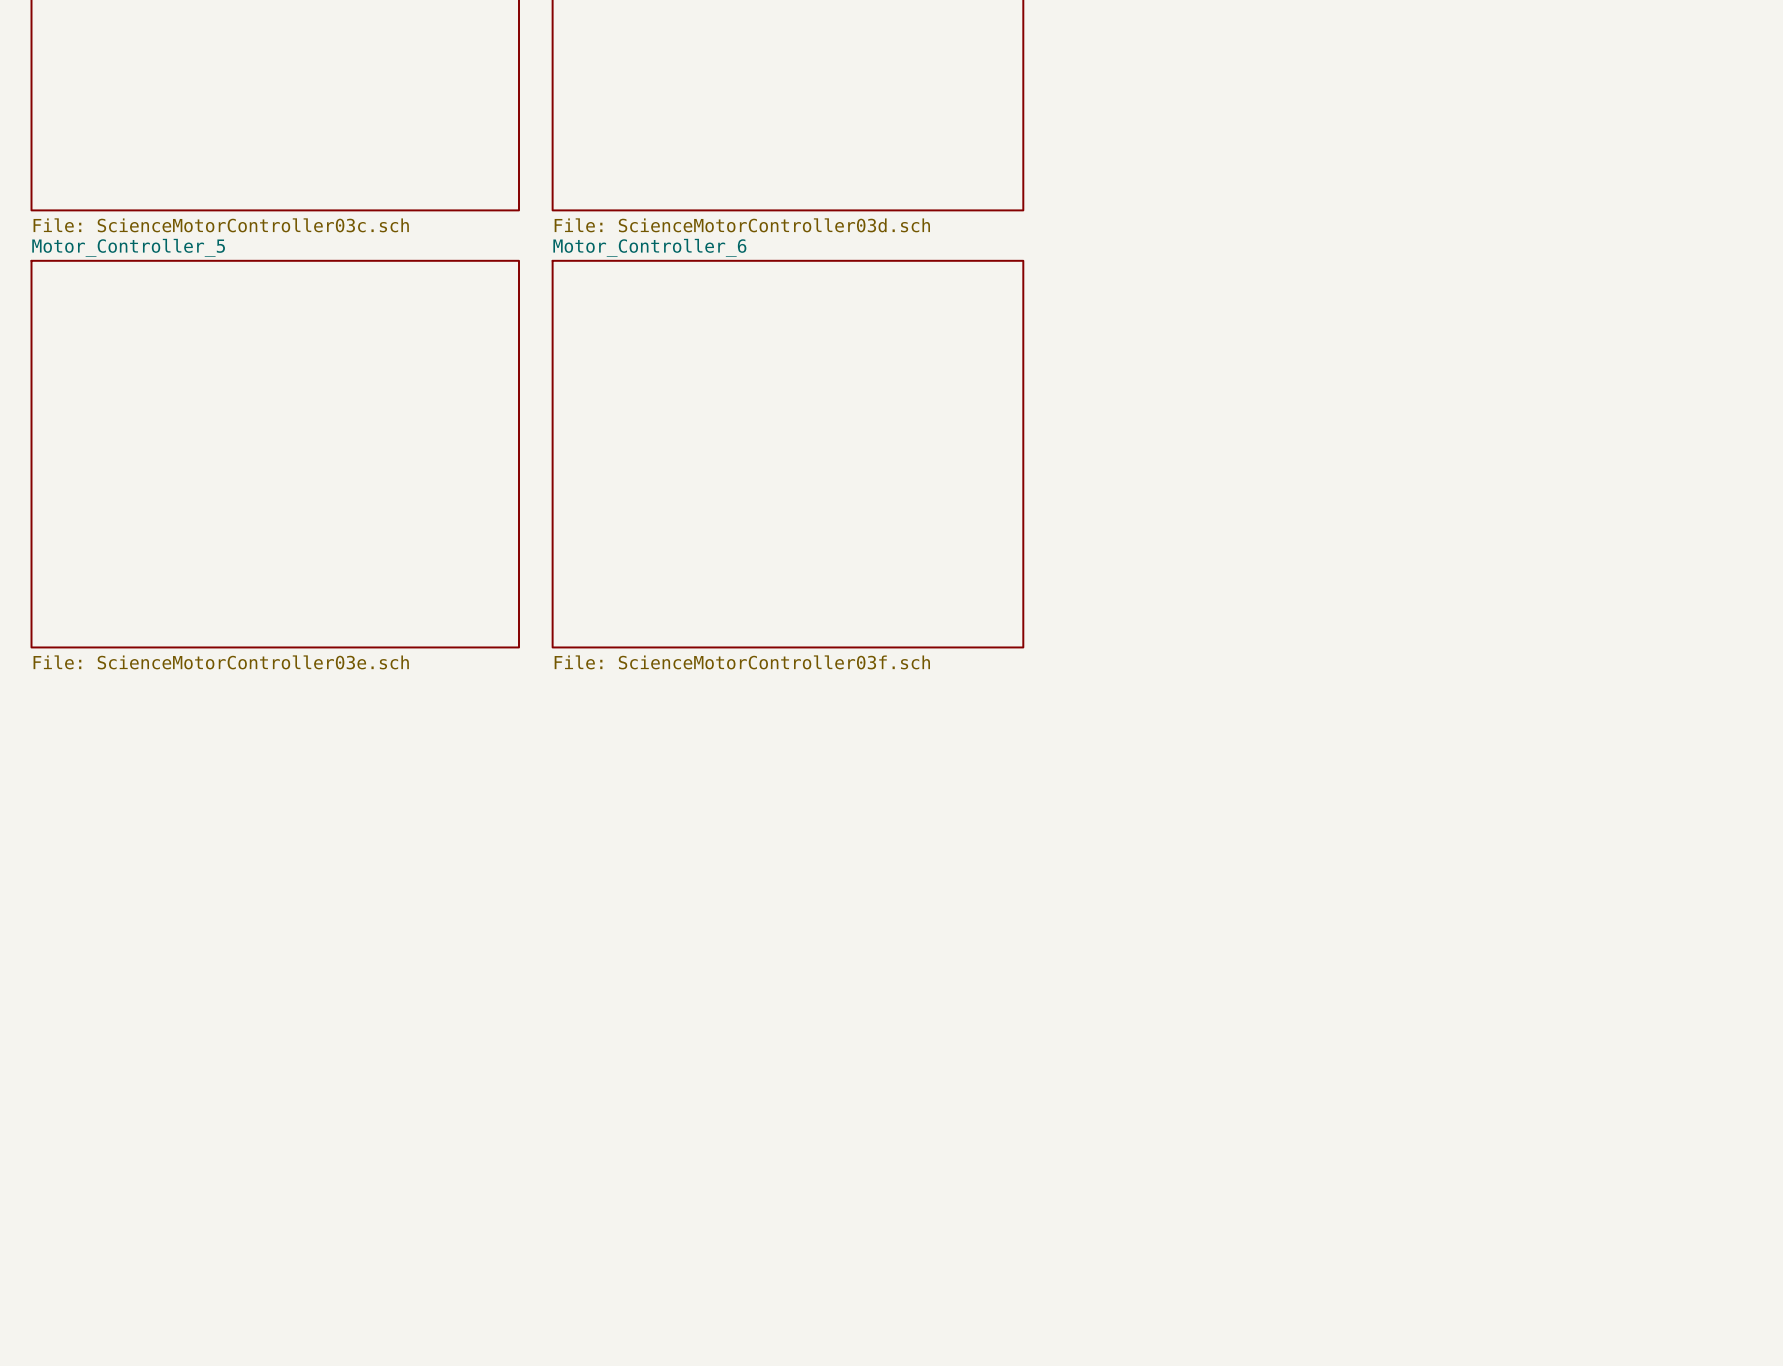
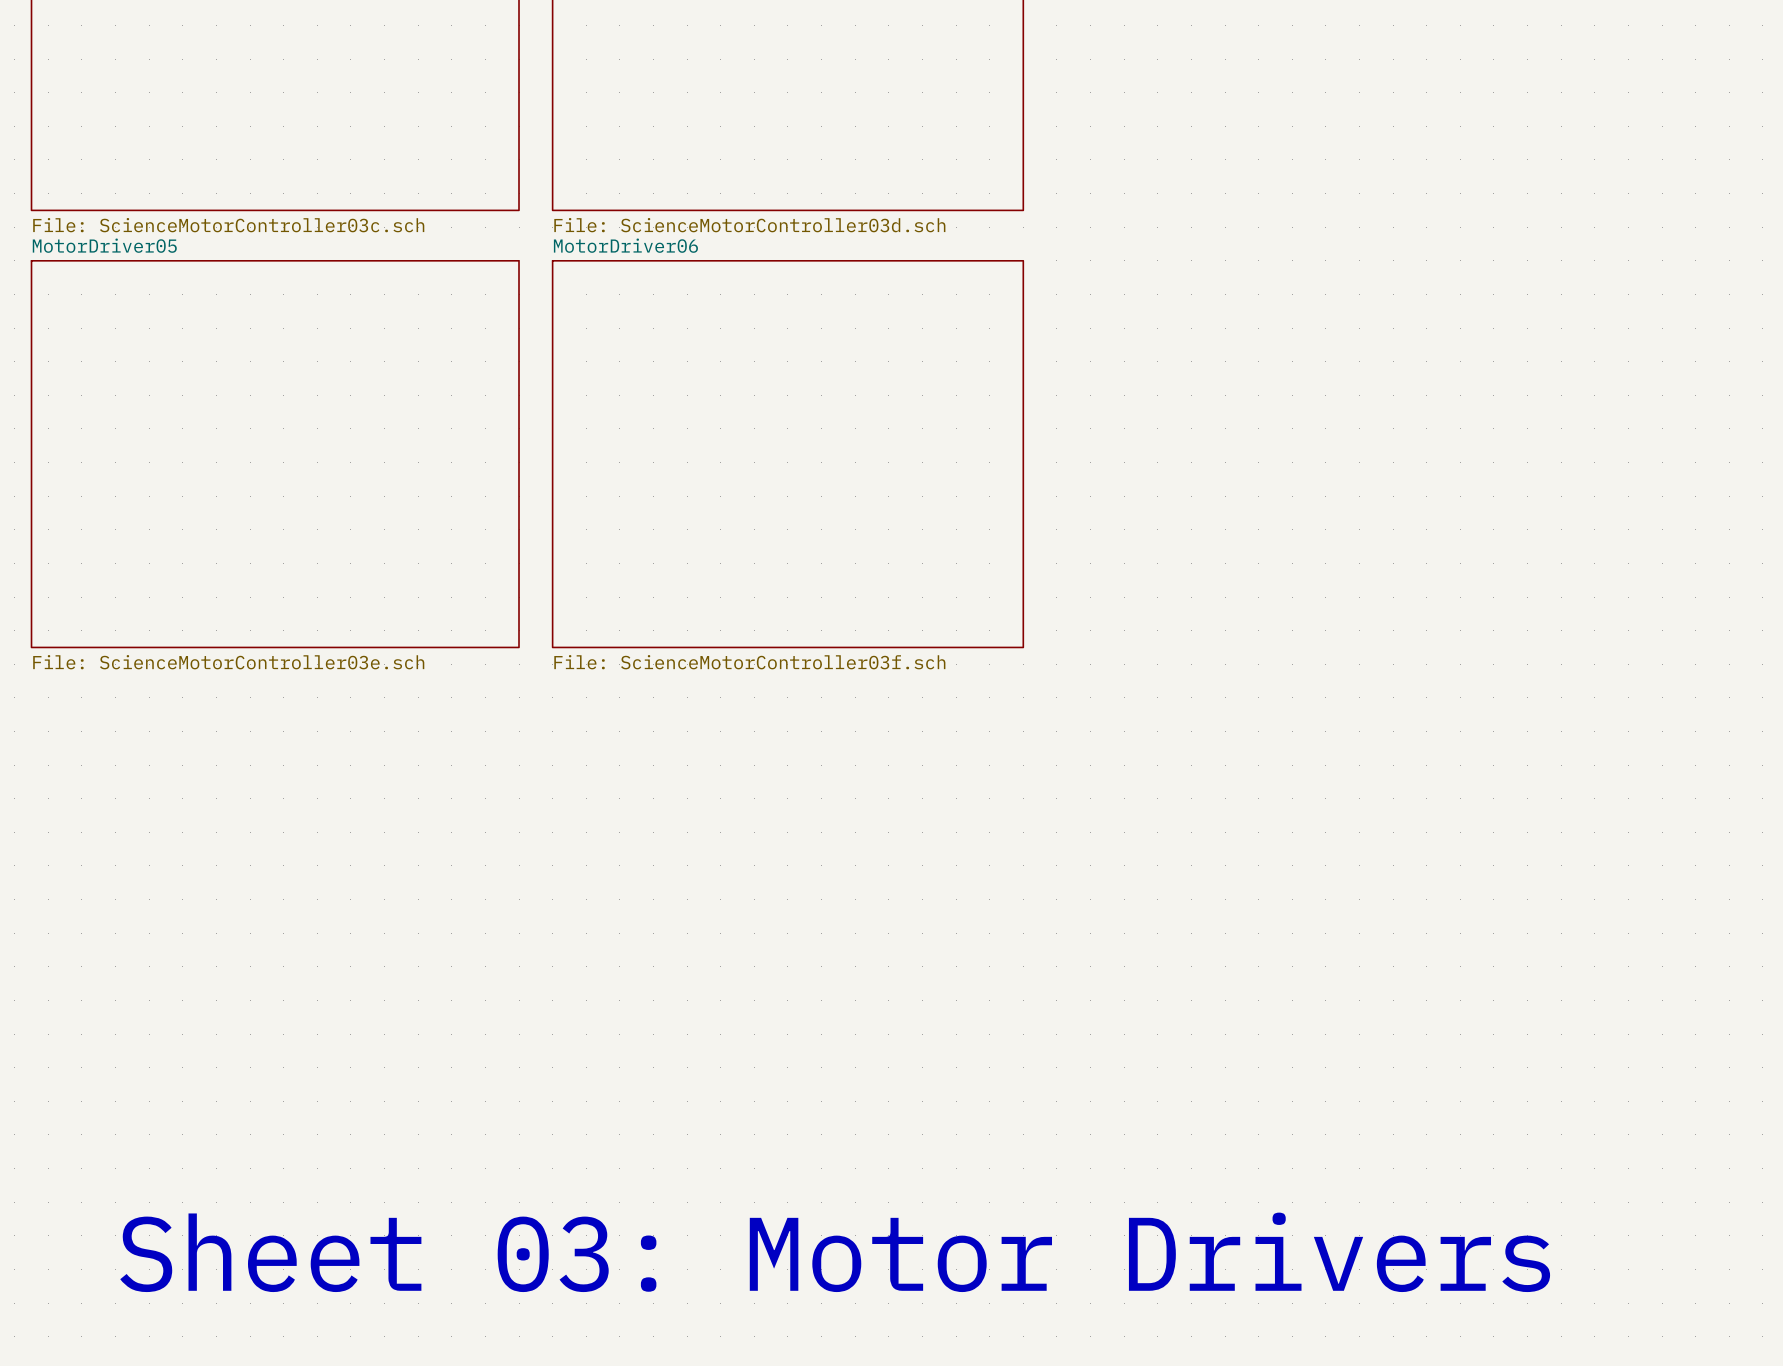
sheet Motor_Controller_5 name: Motor_Controller_5 (128, 247) -> MotorDriver05 (104, 245)
sheet Motor_Controller_6 name: Motor_Controller_6 (649, 247) -> MotorDriver06 (625, 245)
text: none -> Sheet 03: Motor Drivers (835, 1252)

